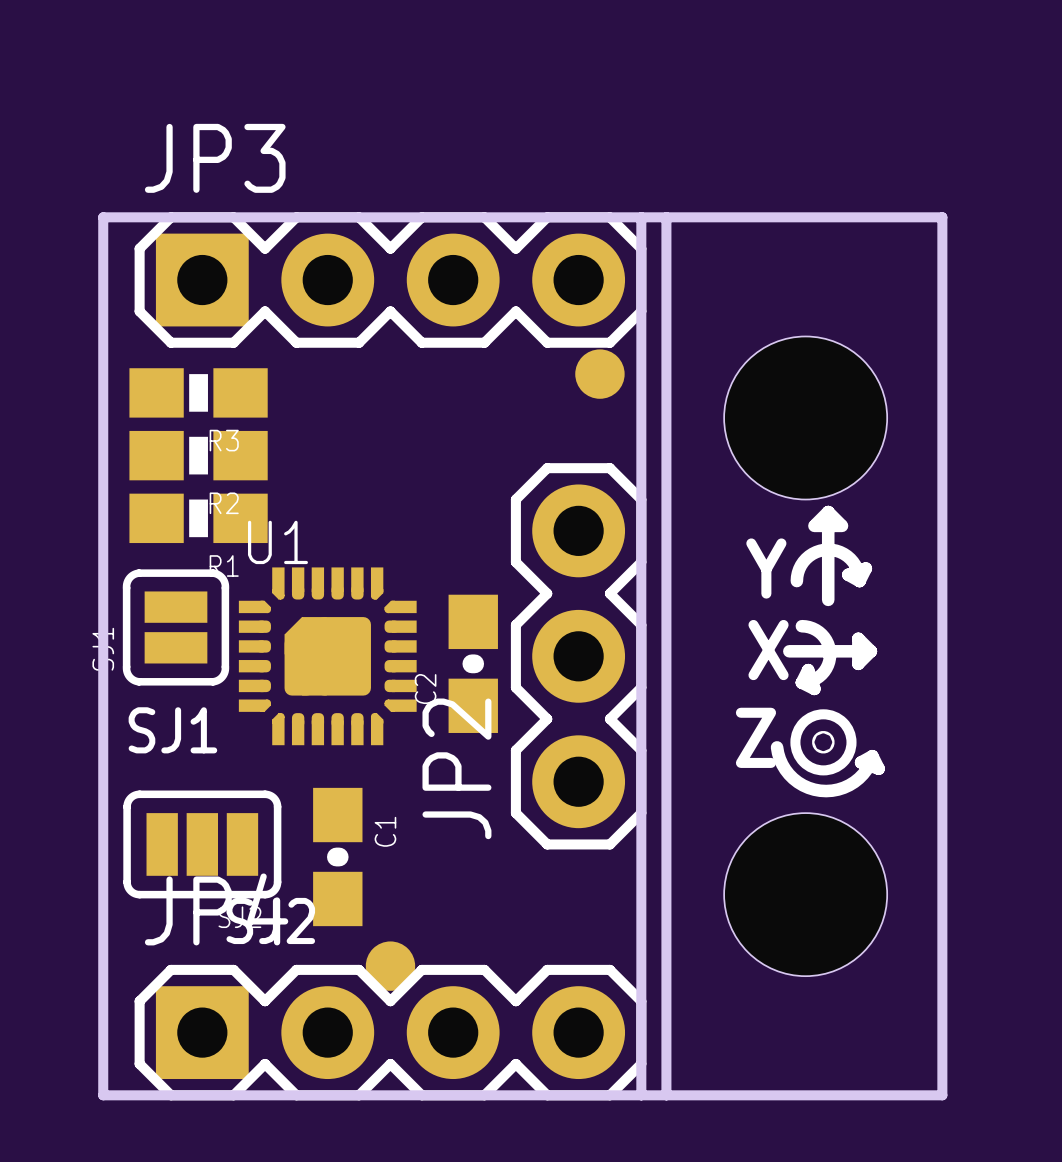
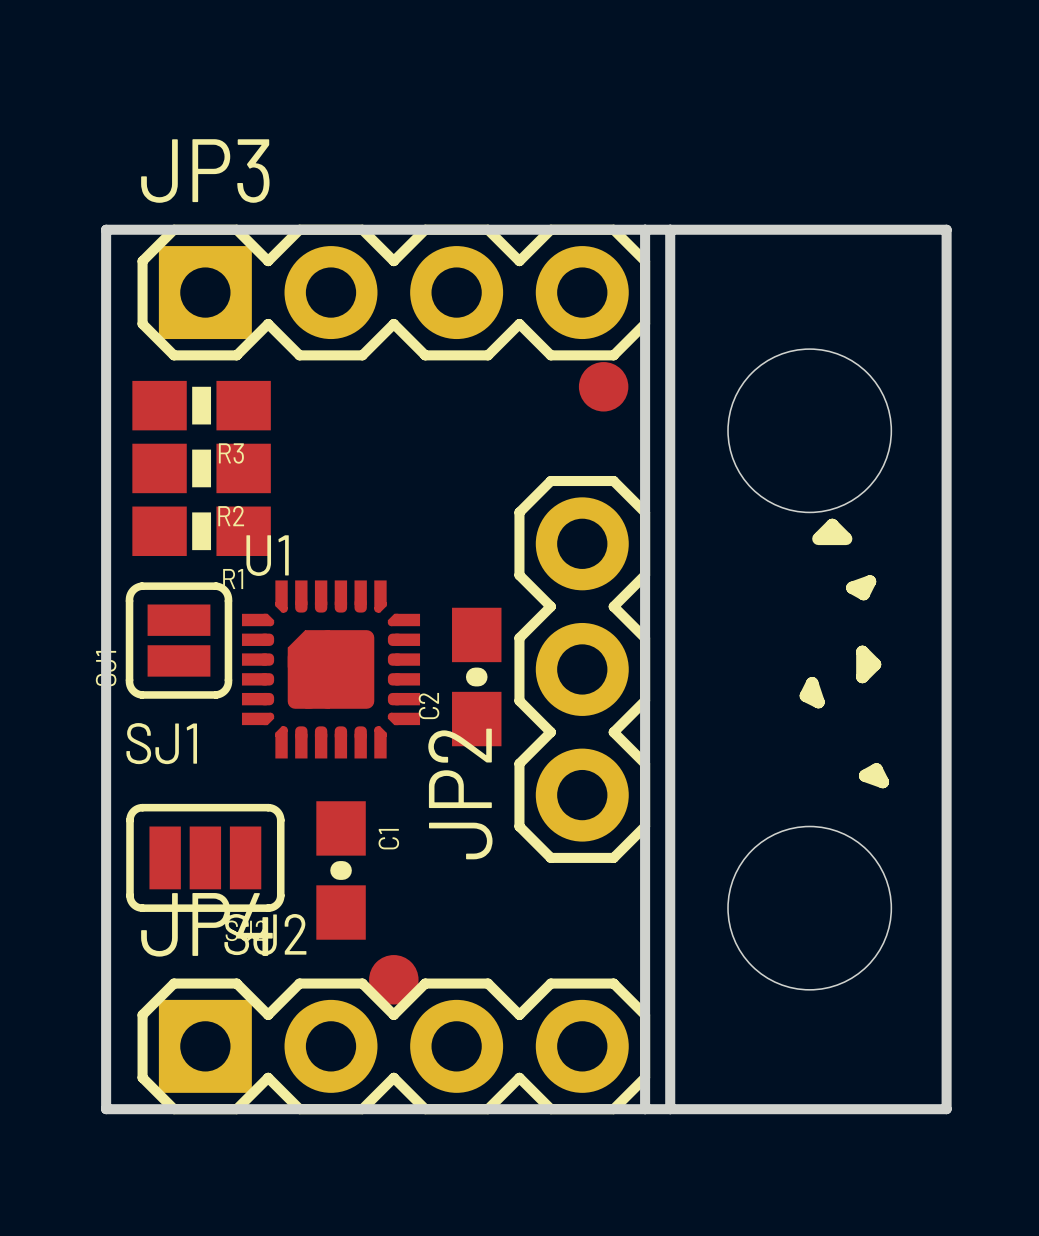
line: (828, 512) (828, 599) -> none
text: Y (766, 568) -> none
line: (796, 581) (799, 569) (806, 558) (816, 552) (828, 549) (840, 552) (850, 558) (857, 569) (859, 581) -> none
line: (801, 626) (812, 628) (821, 634) (827, 643) (830, 654) (827, 665) (821, 674) (812, 680) (801, 682) -> none
text: X (768, 650) -> none
line: (789, 651) (870, 651) -> none
drawing: [790, 709, 857, 776] -> none
text: Z (755, 737) -> none
line: (777, 747) (779, 759) (789, 774) (803, 785) (820, 790) (838, 789) (849, 785) (863, 774) (872, 758) -> none

